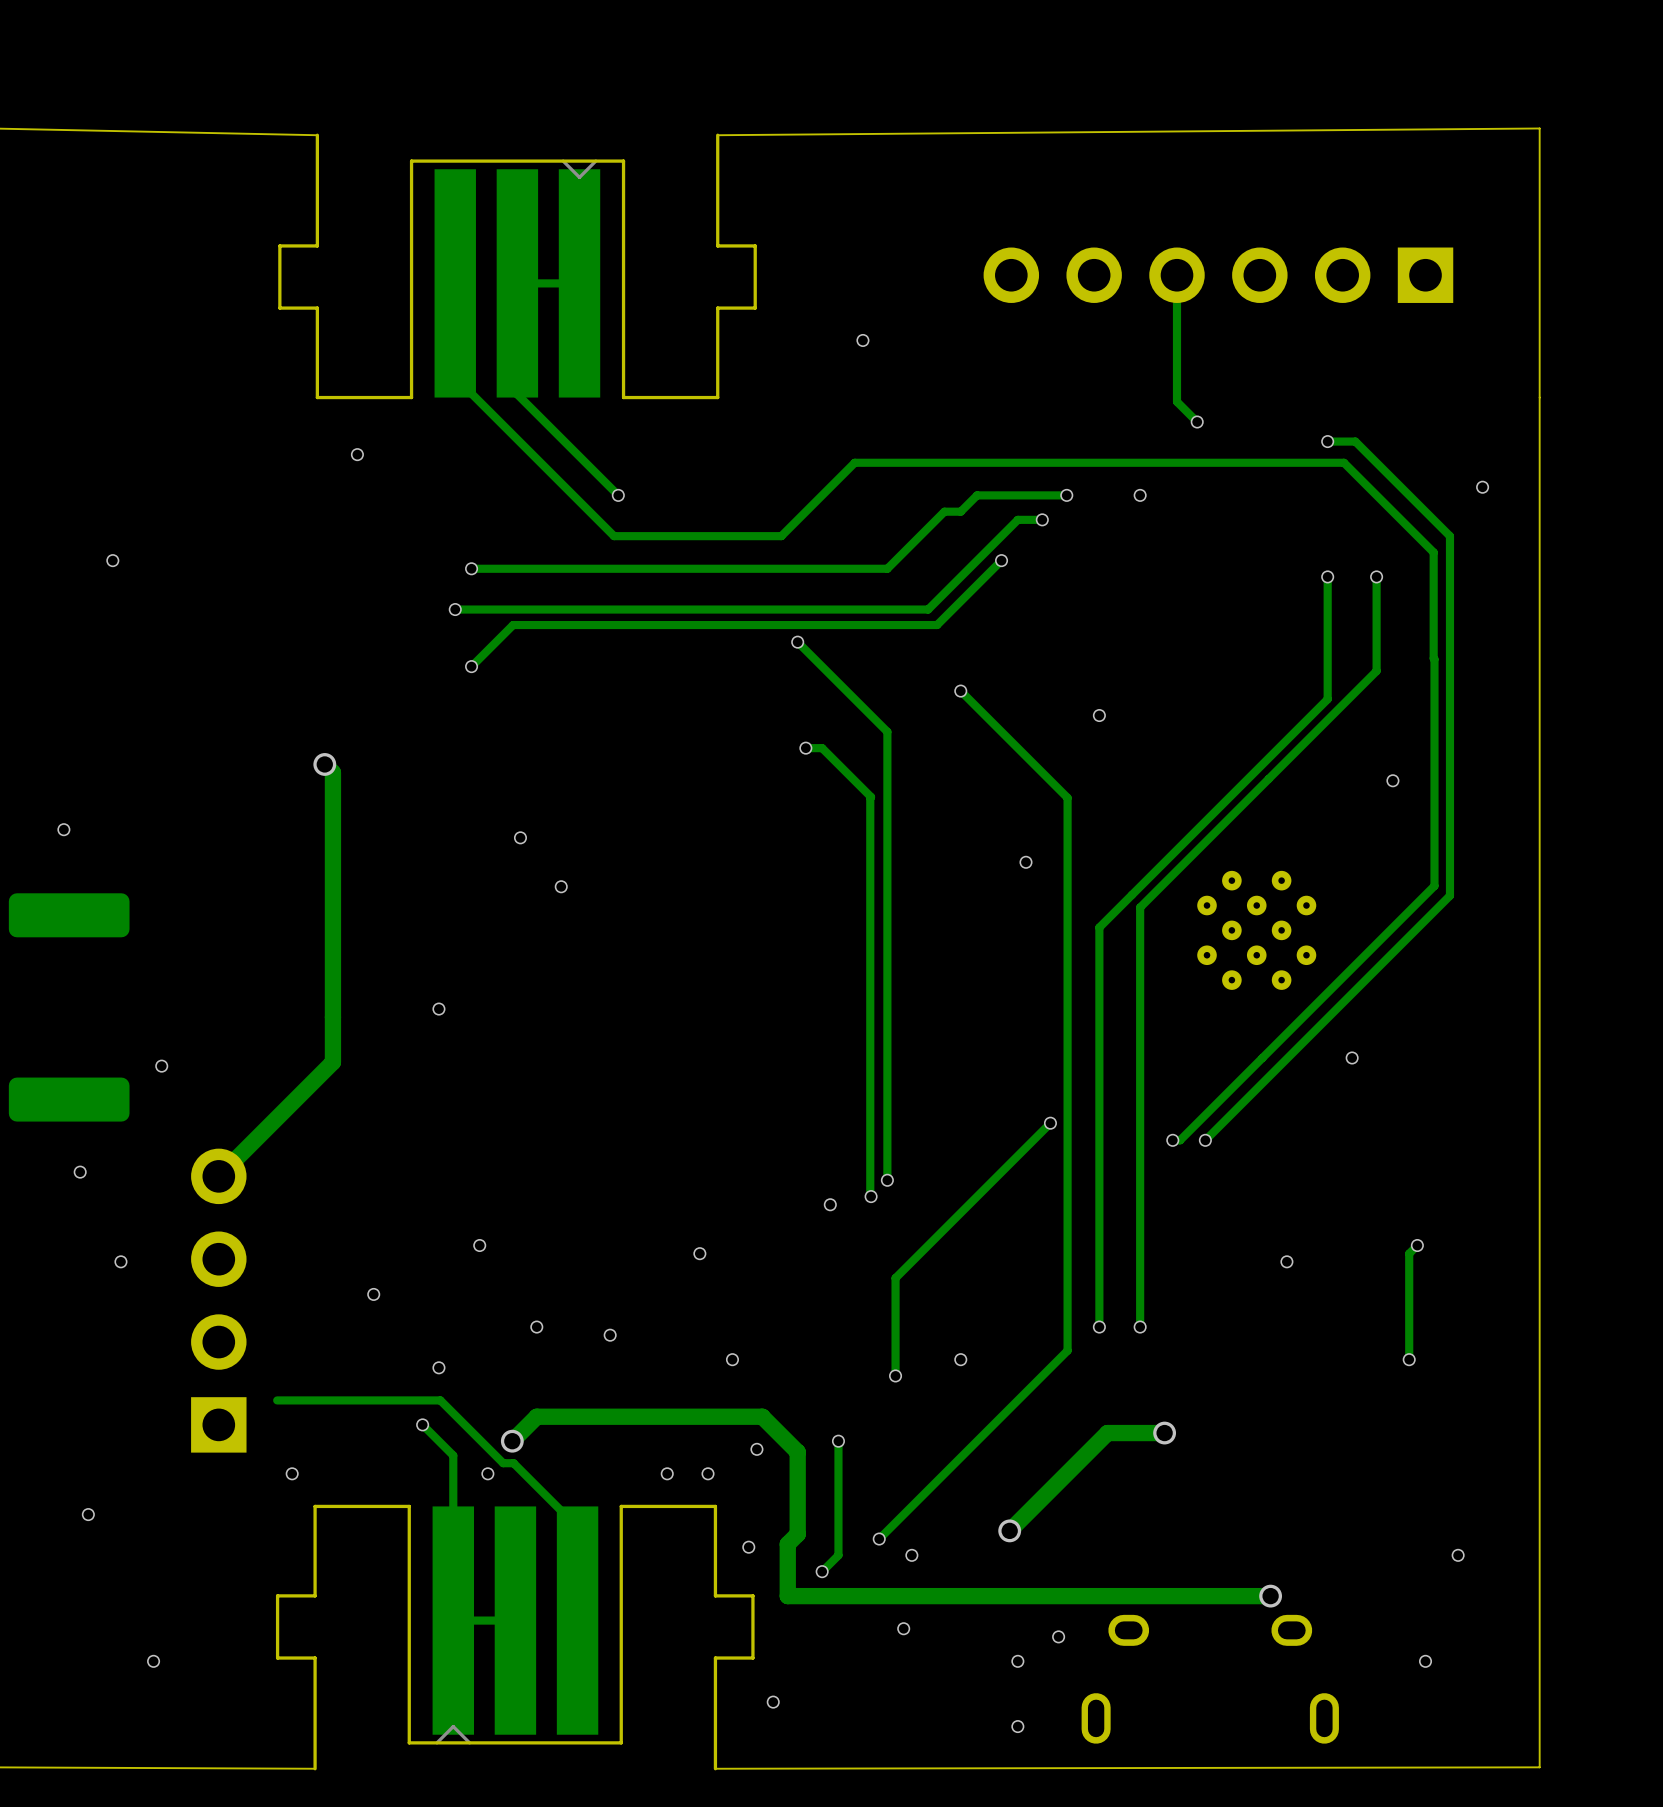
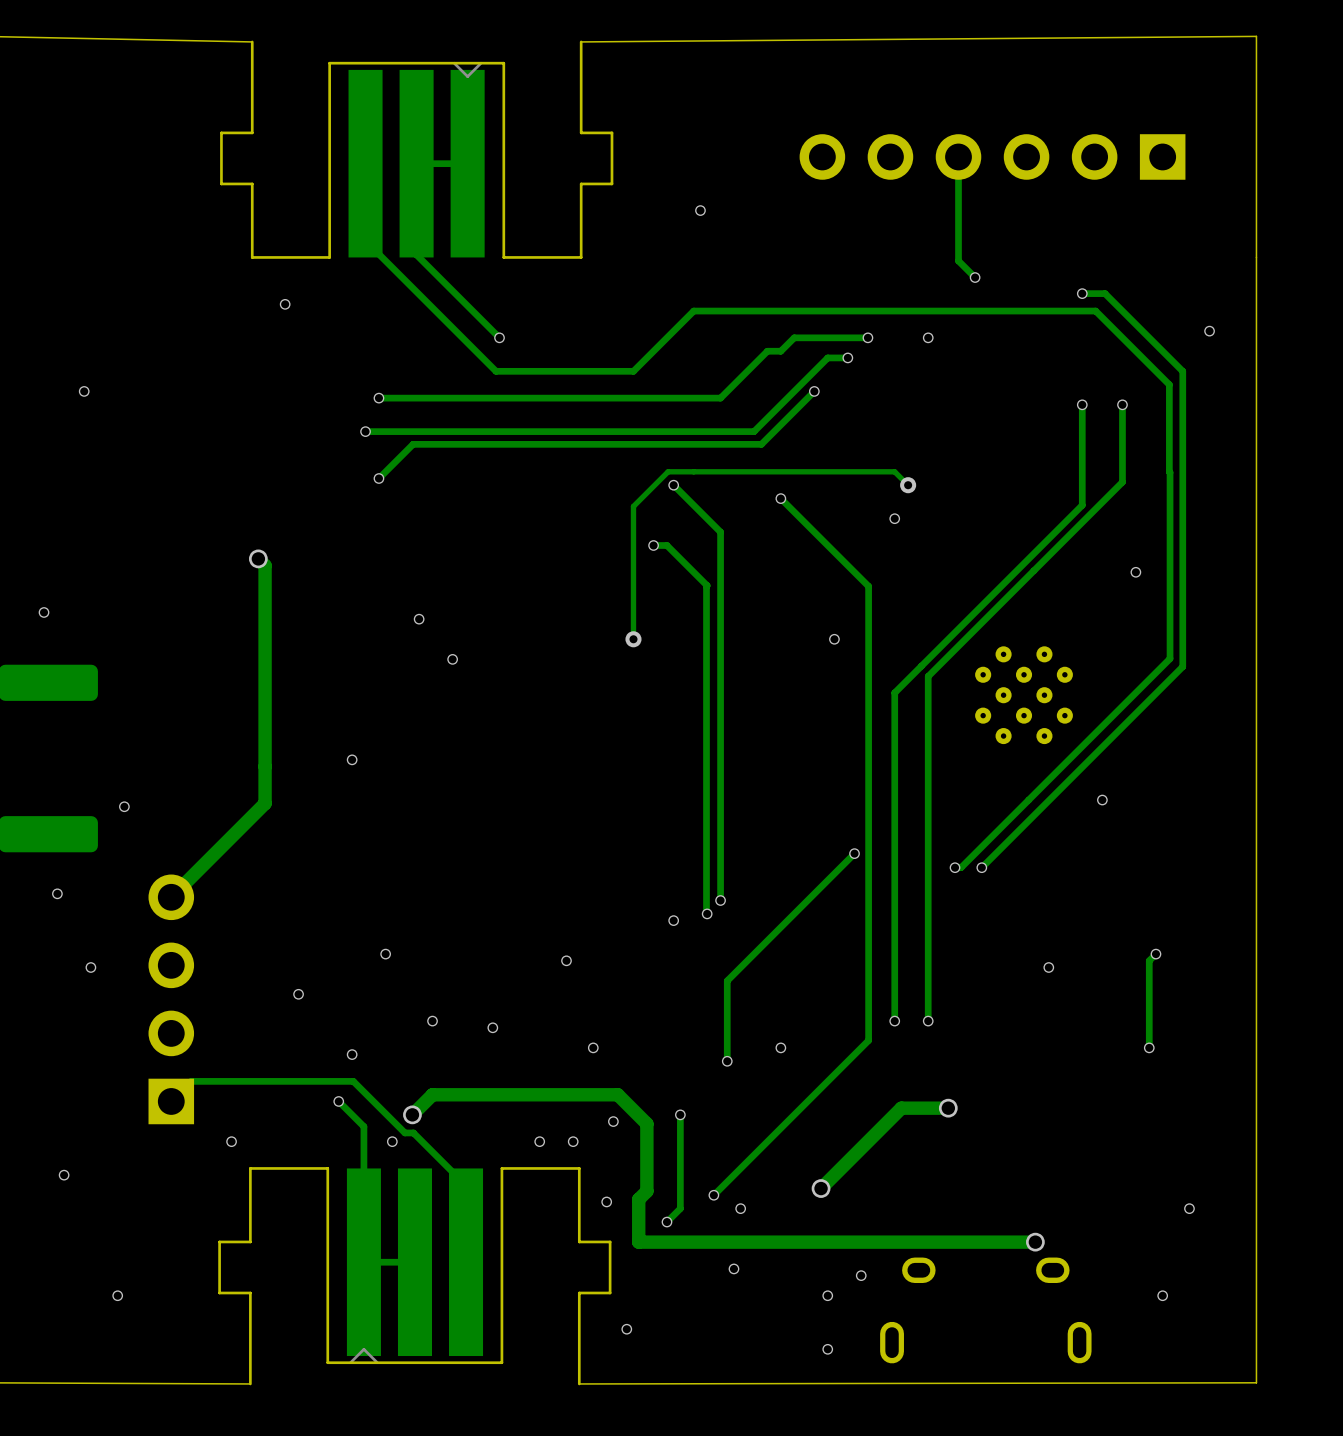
track: (797, 642) (830, 674) -> none
via position: (797, 642) -> (673, 485)
track: none -> (908, 485) (894, 471) (668, 471) (633, 506) (633, 639)
via: none -> (908, 485)
via: none -> (633, 639)
track: none -> (219, 1081) (191, 1081) (171, 1101)

